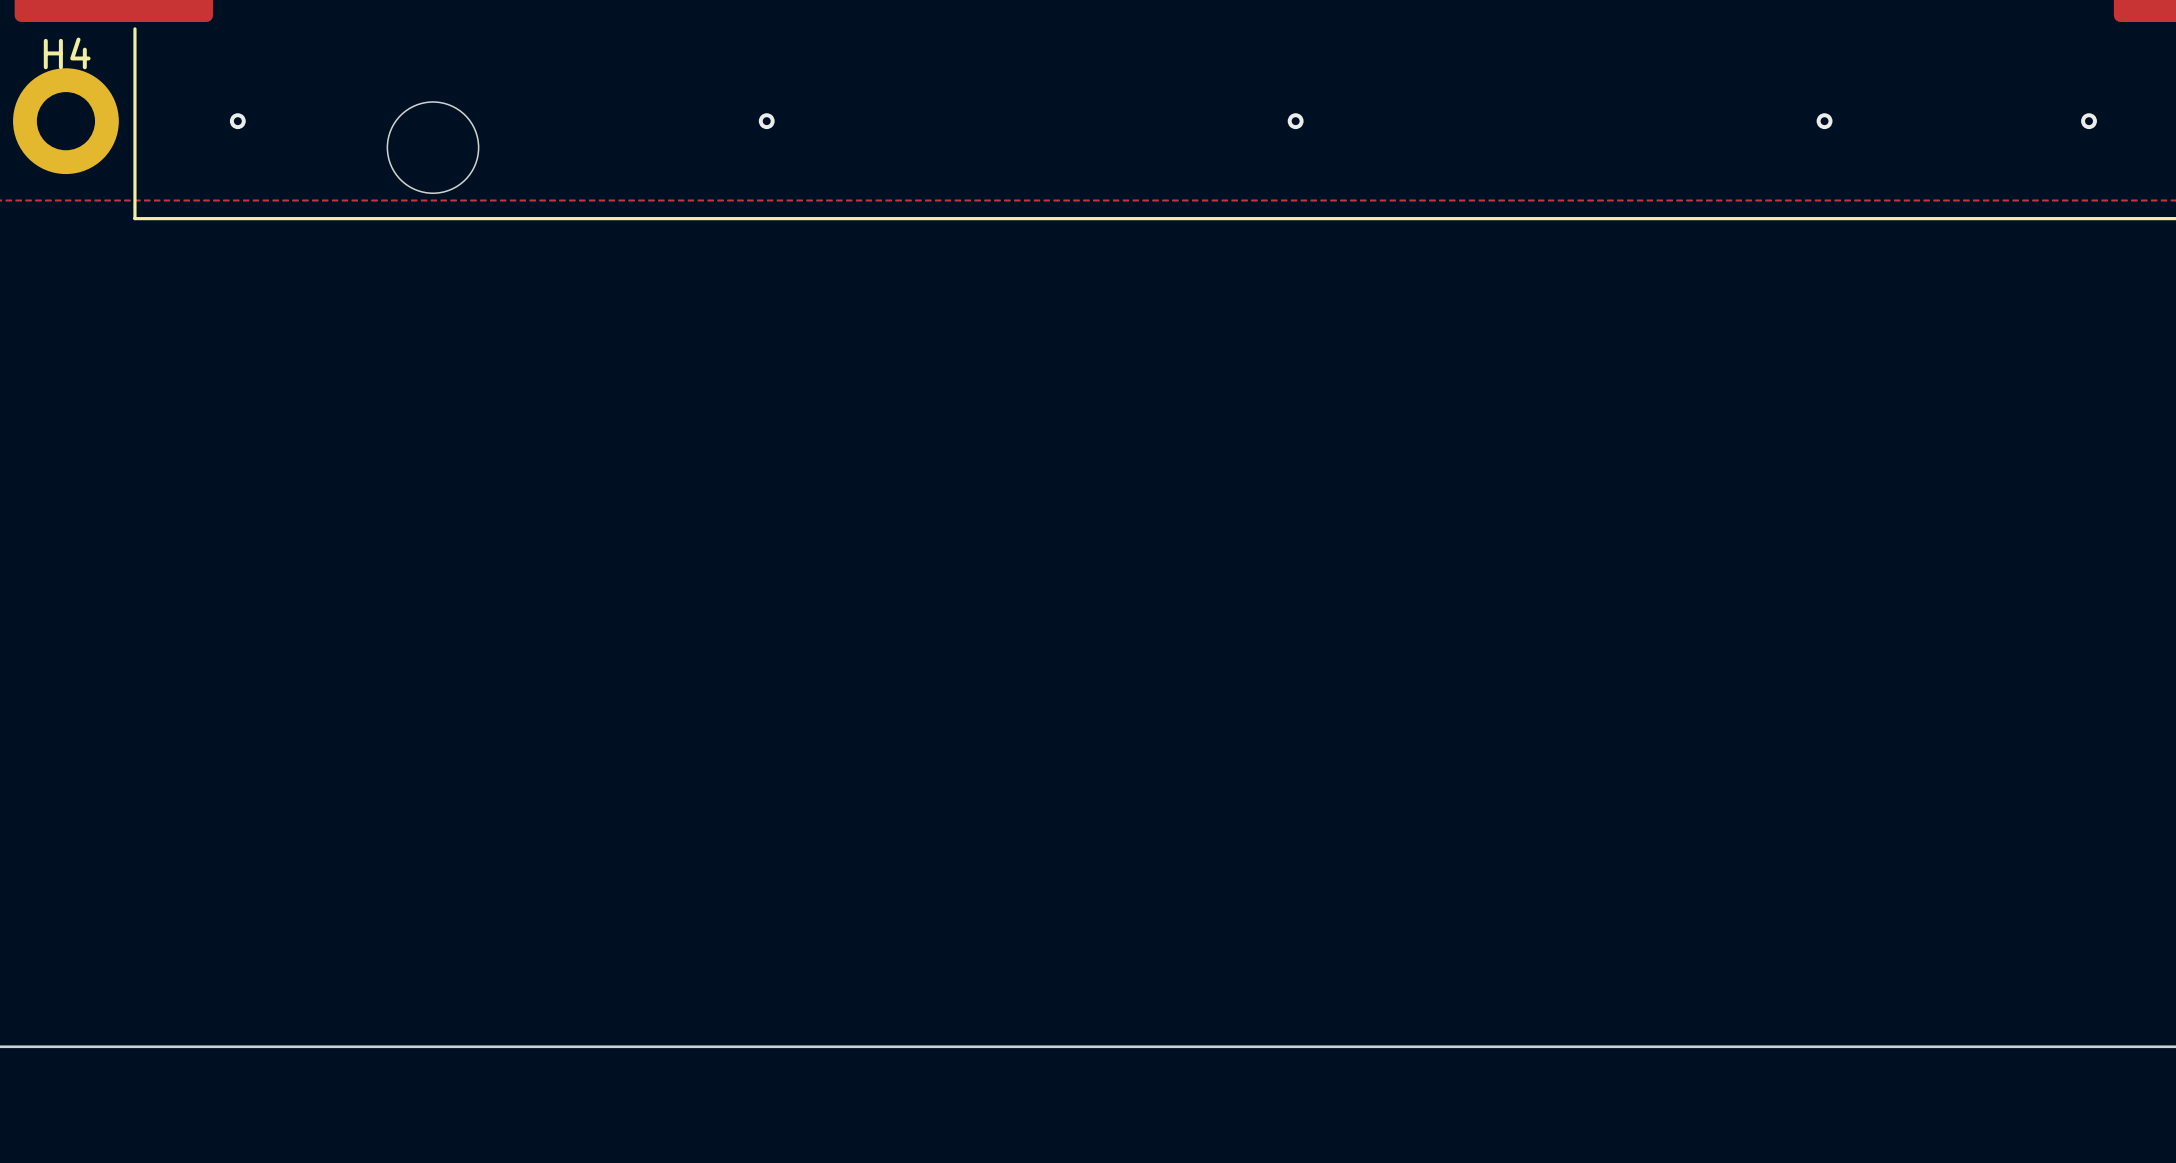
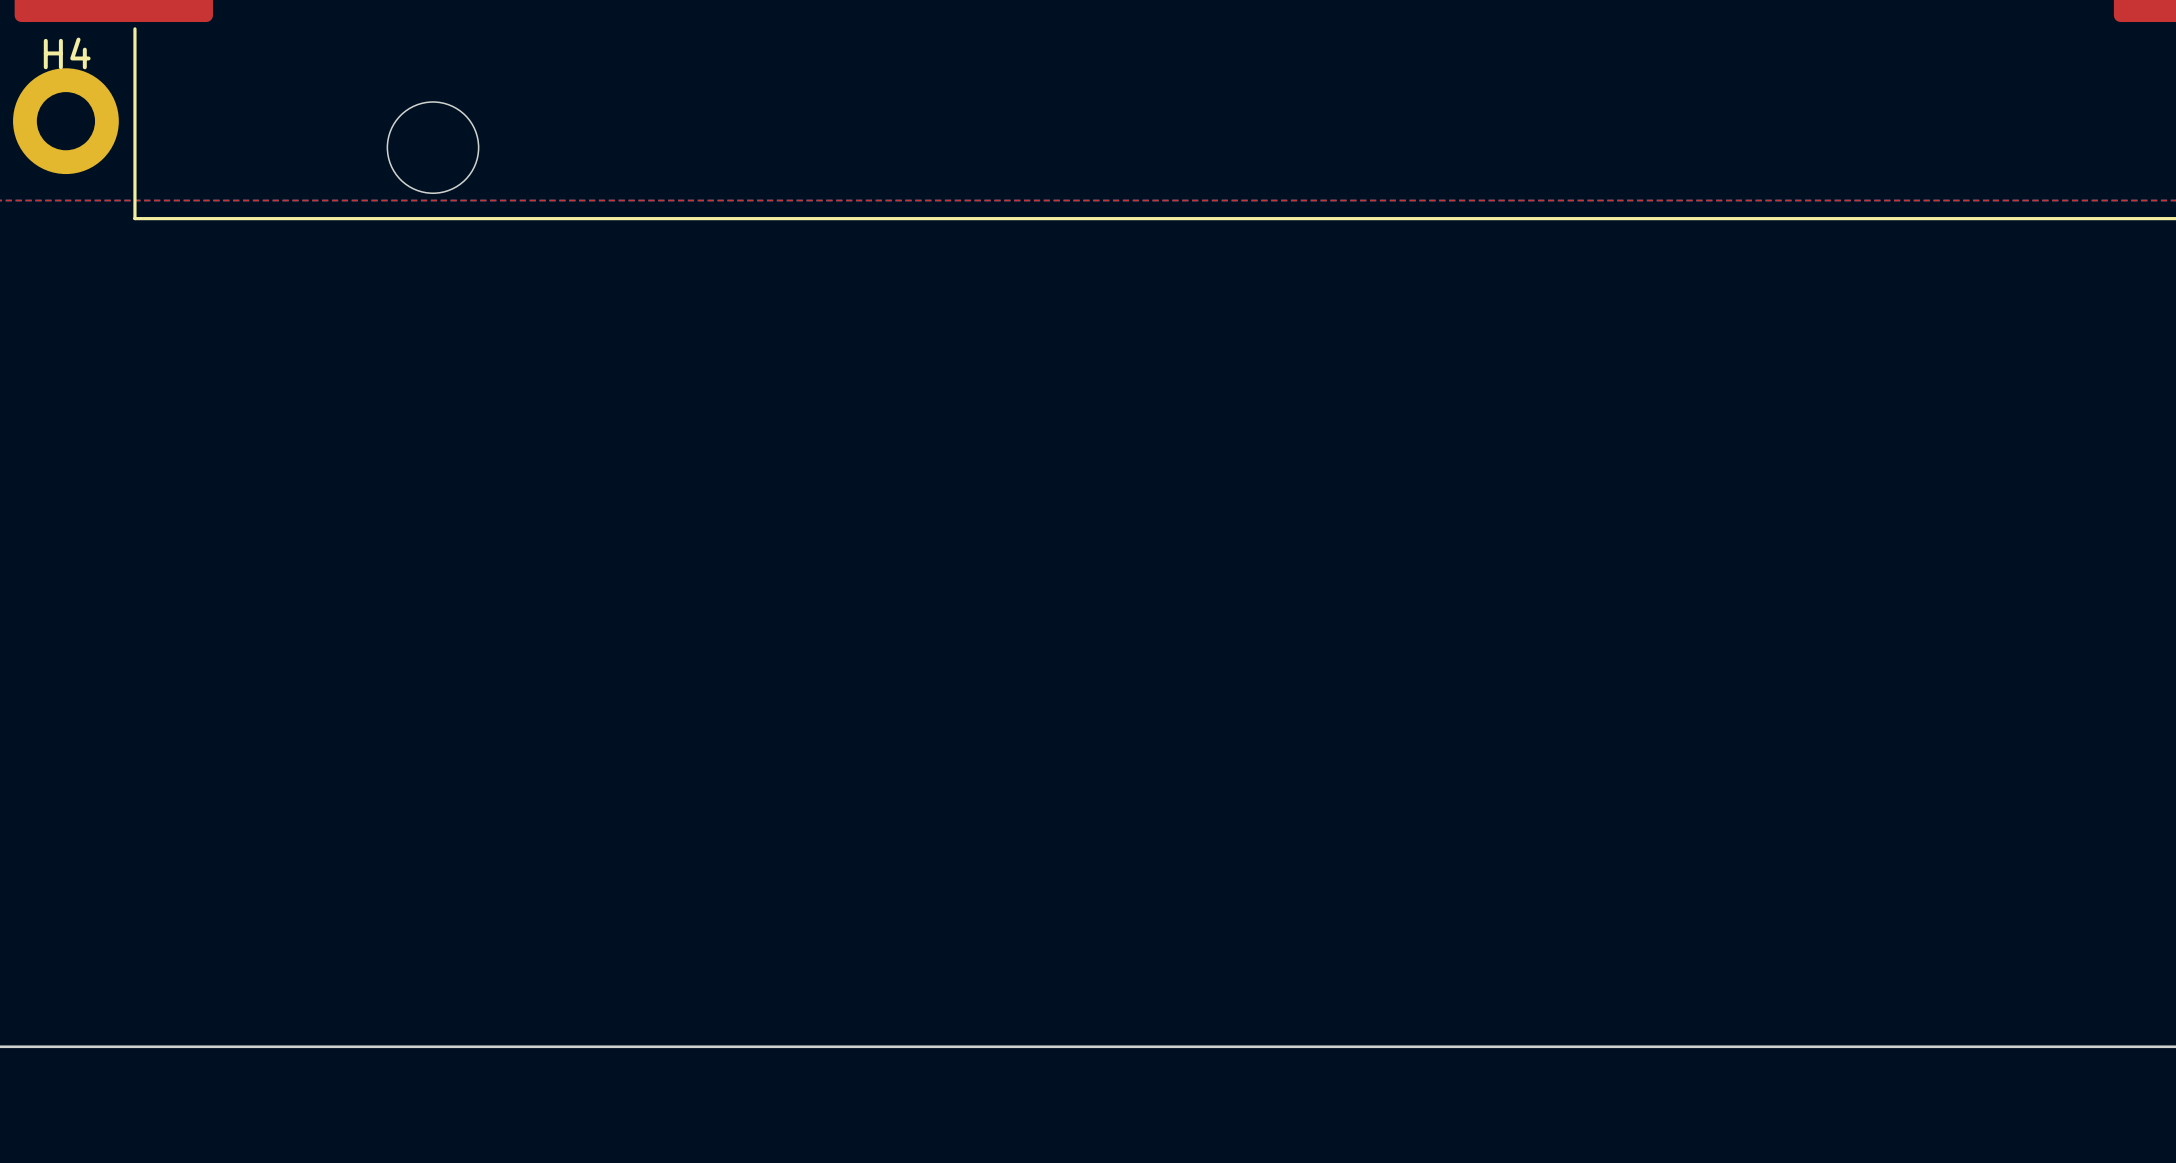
via: (237, 121) -> none
via: (766, 121) -> none
via: (1295, 121) -> none
via: (1824, 121) -> none
via: (2089, 121) -> none

